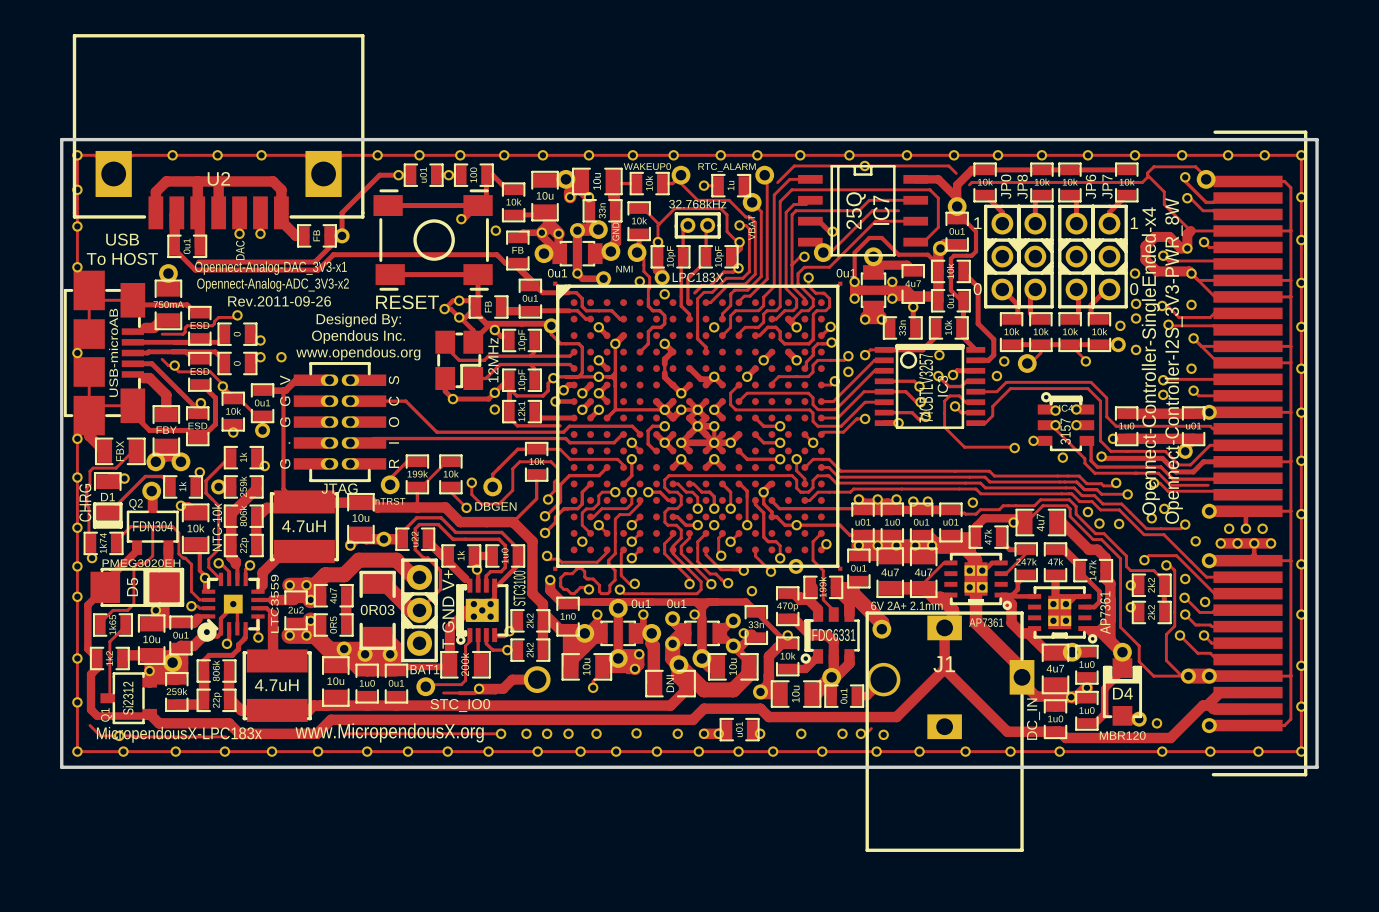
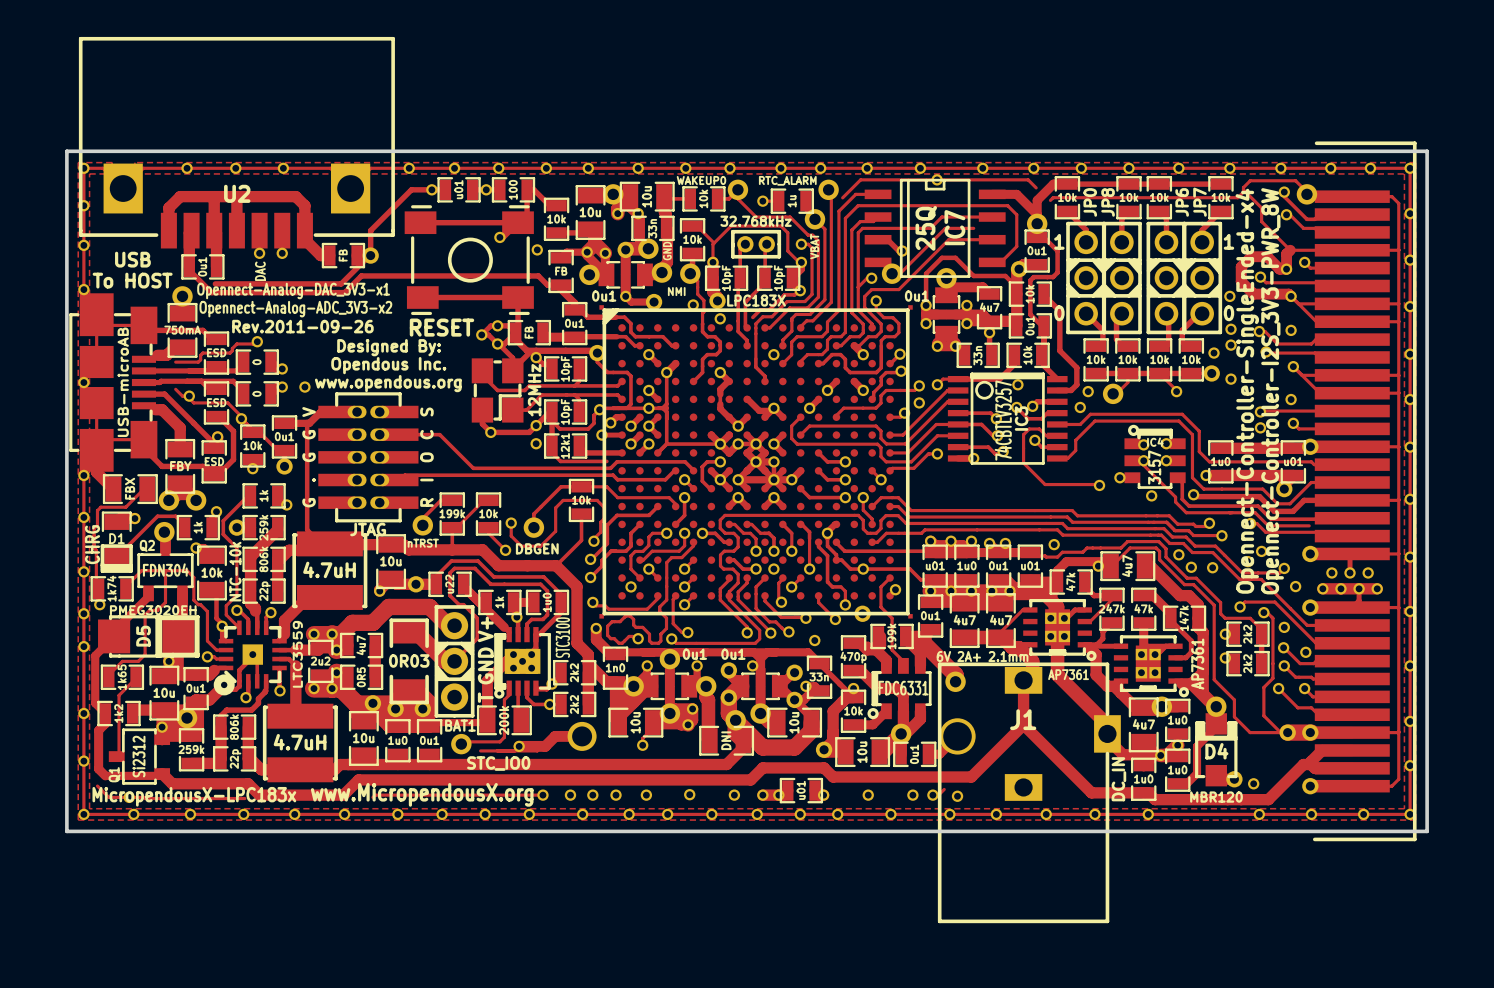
zone outline: none -> (78, 162) (112, 162) (112, 173) (89, 173) (89, 808) (1404, 808) (1404, 173) (134, 173) (134, 162) (1415, 162) (1415, 820) (78, 820) (78, 162)

